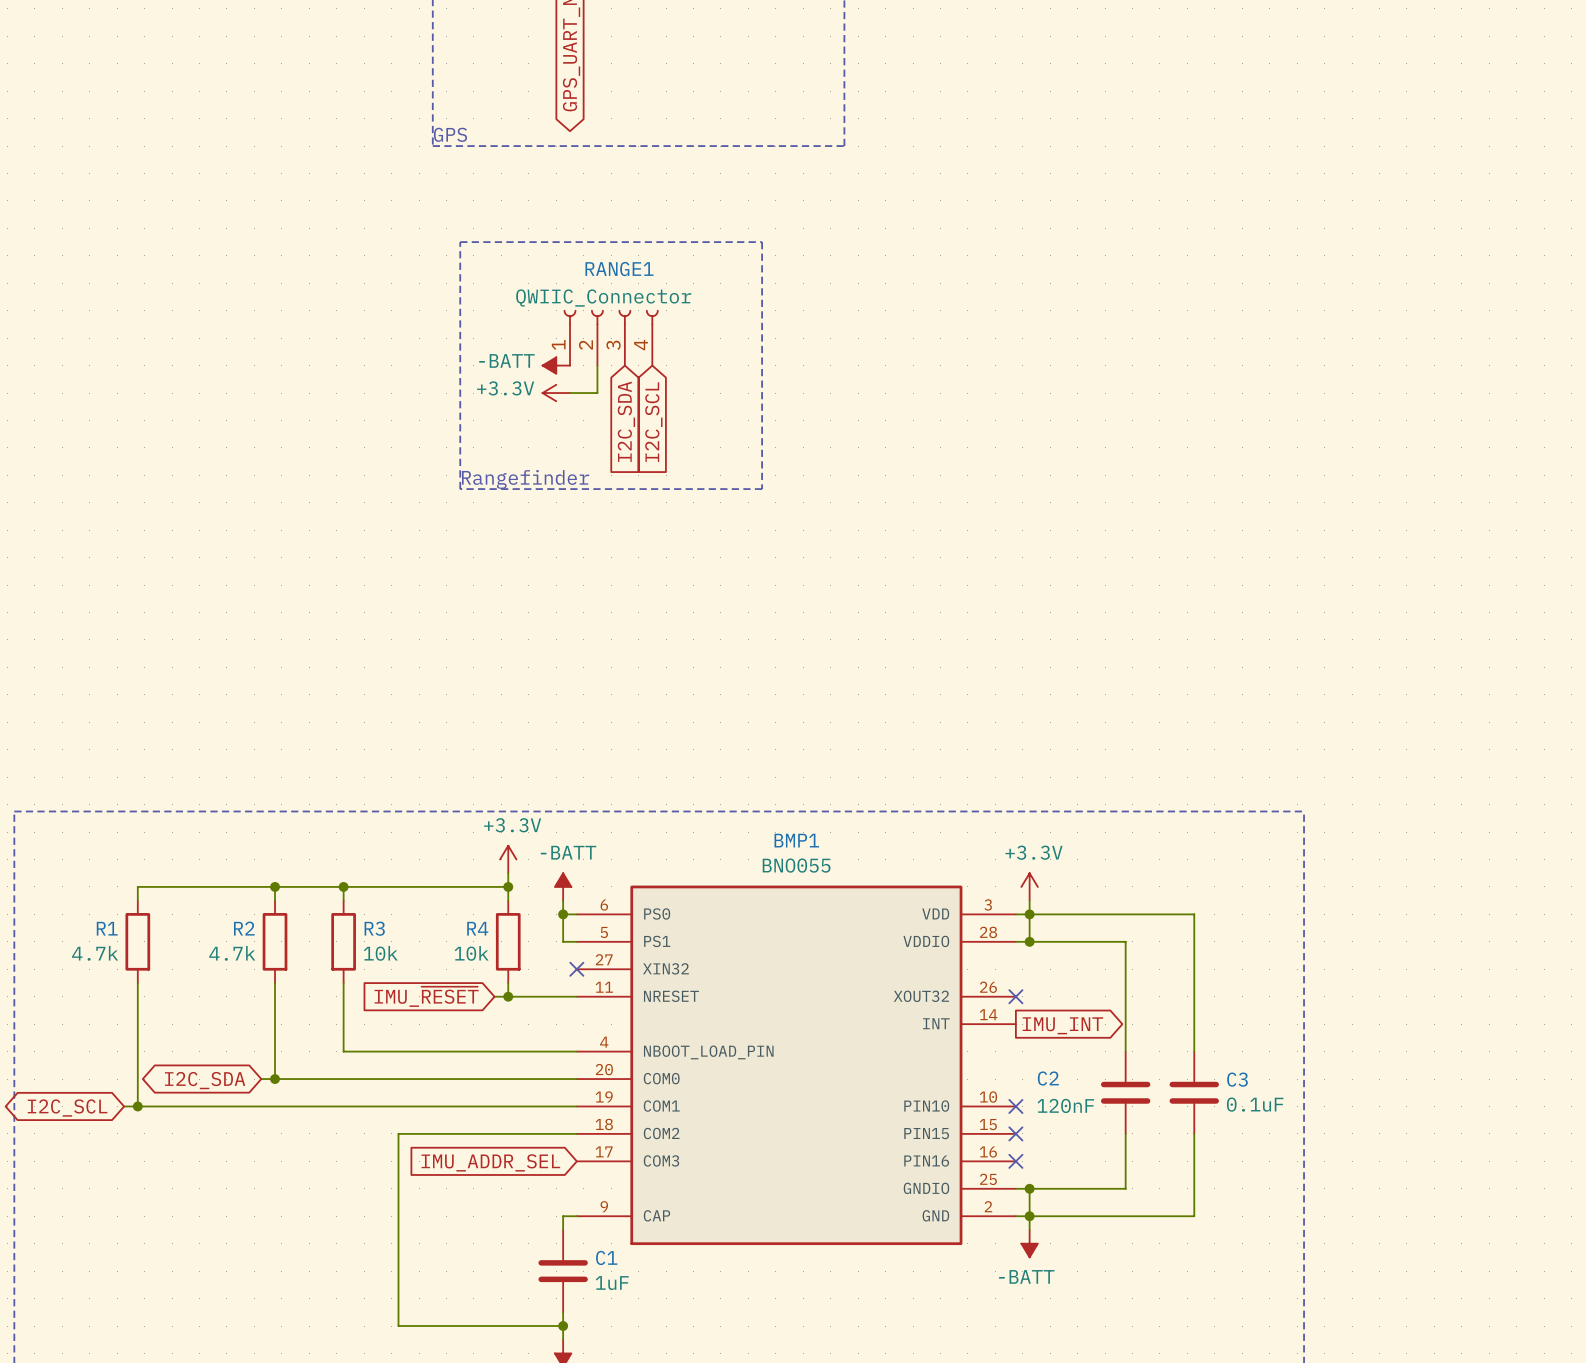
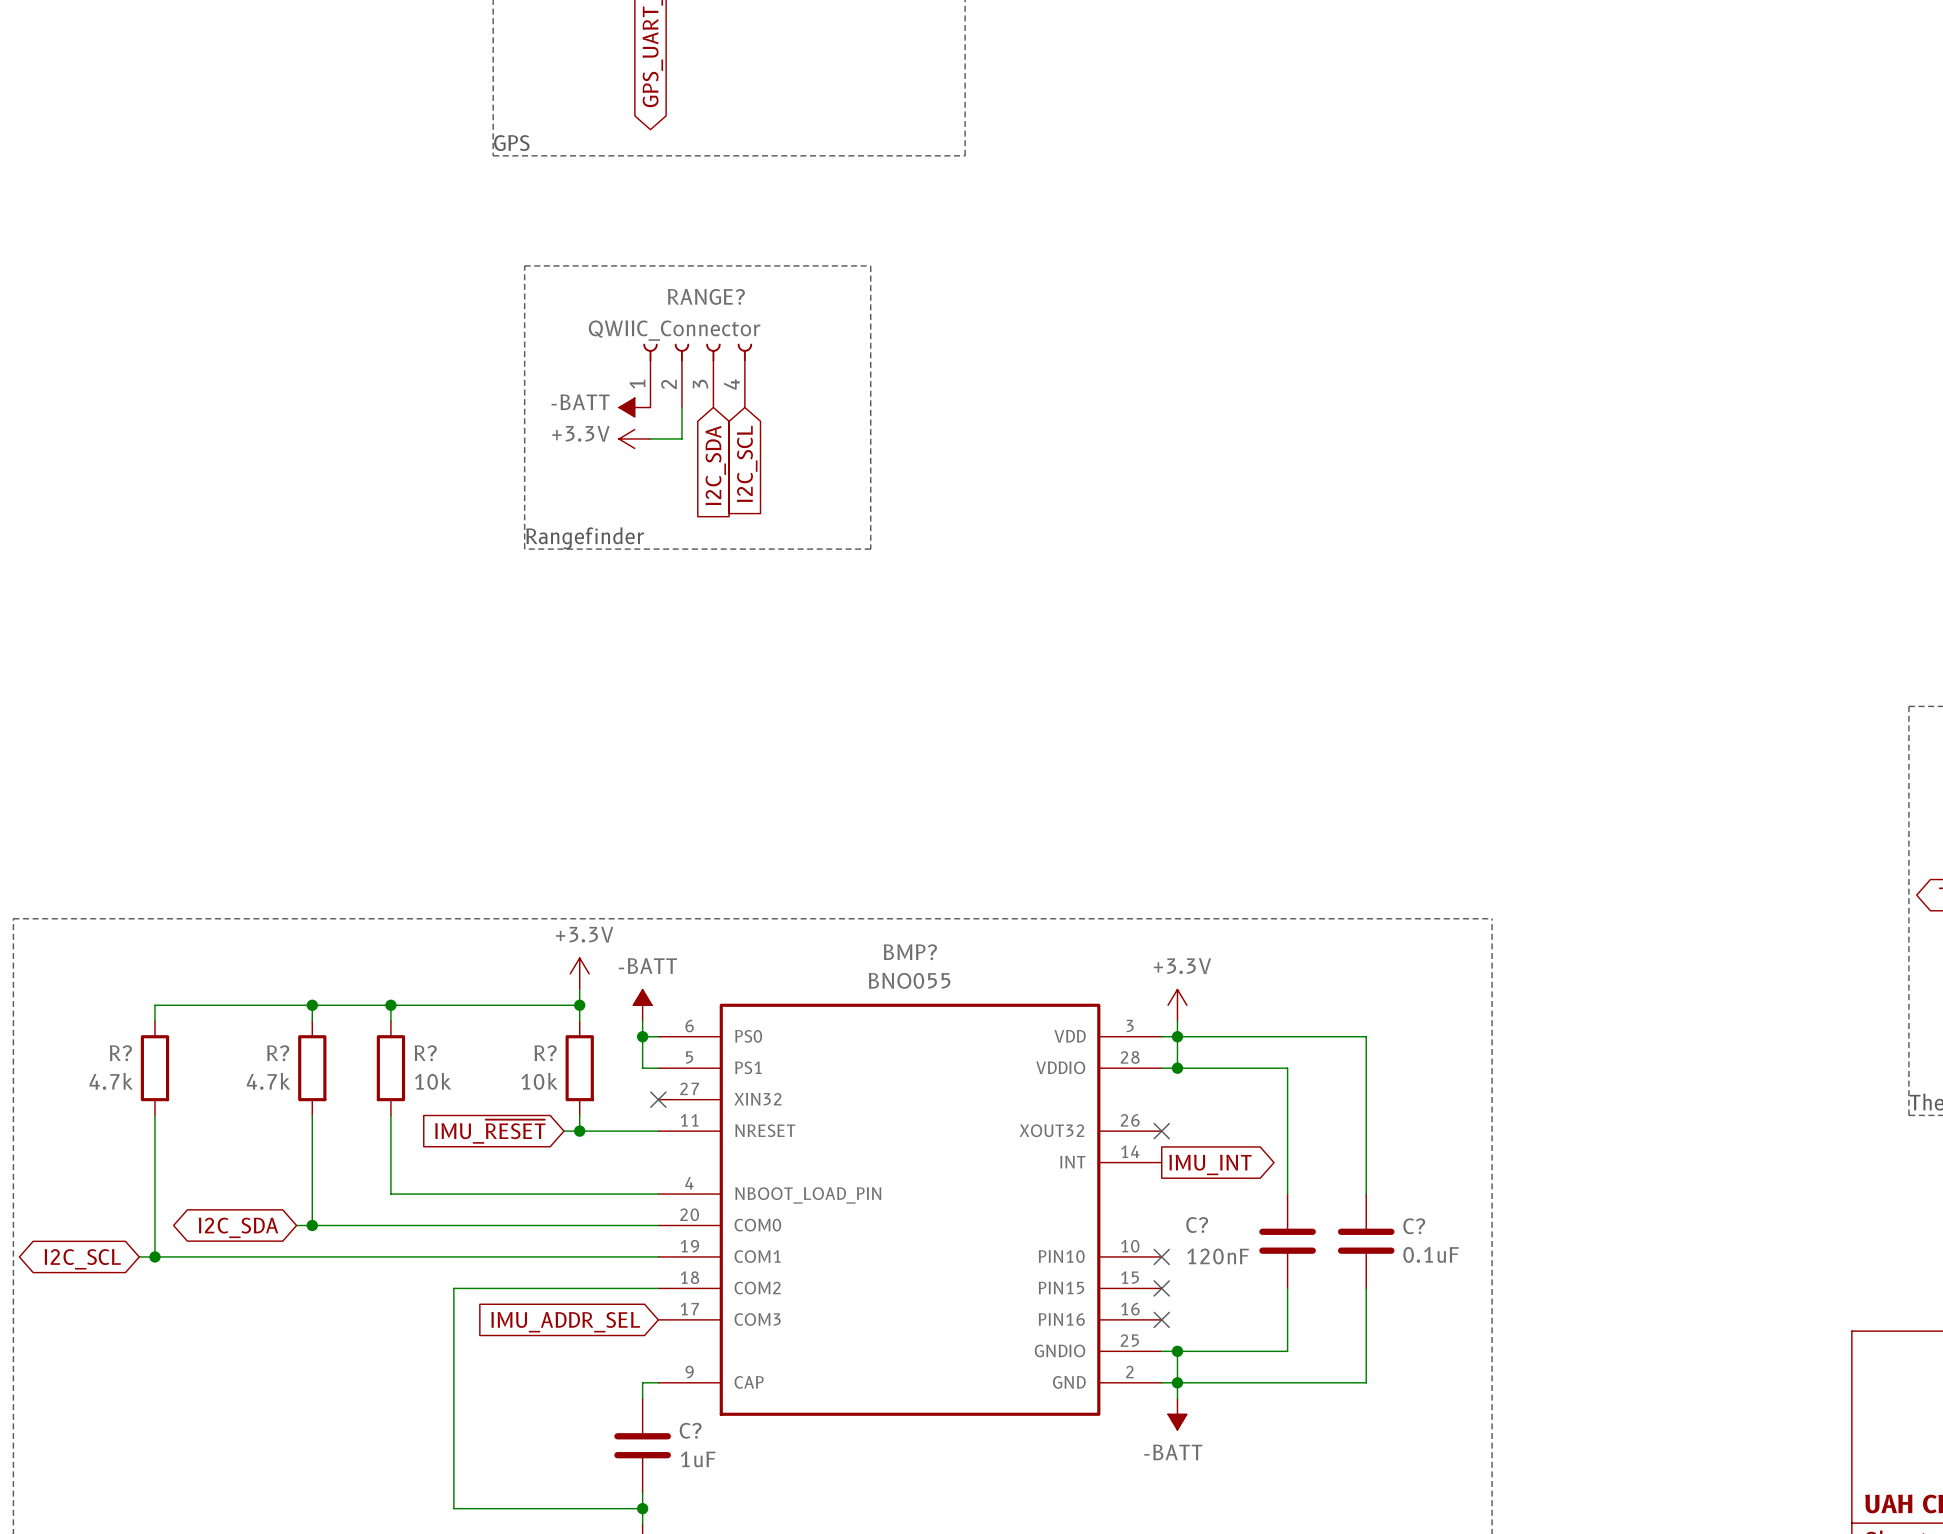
RANGE1 name: RANGE1 (619, 269) -> RANGE? (706, 296)
BMP1 name: BMP1 (796, 840) -> BMP? (910, 952)
R1 name: R1 (107, 928) -> R? (120, 1053)
R2 name: R2 (244, 928) -> R? (278, 1053)
R3 name: R3 (374, 928) -> R? (425, 1053)
R4 name: R4 (477, 928) -> R? (545, 1053)
C2 name: C2 (1048, 1078) -> C? (1197, 1225)
C3 name: C3 (1237, 1079) -> C? (1414, 1226)
C1 name: C1 (606, 1257) -> C? (690, 1430)

